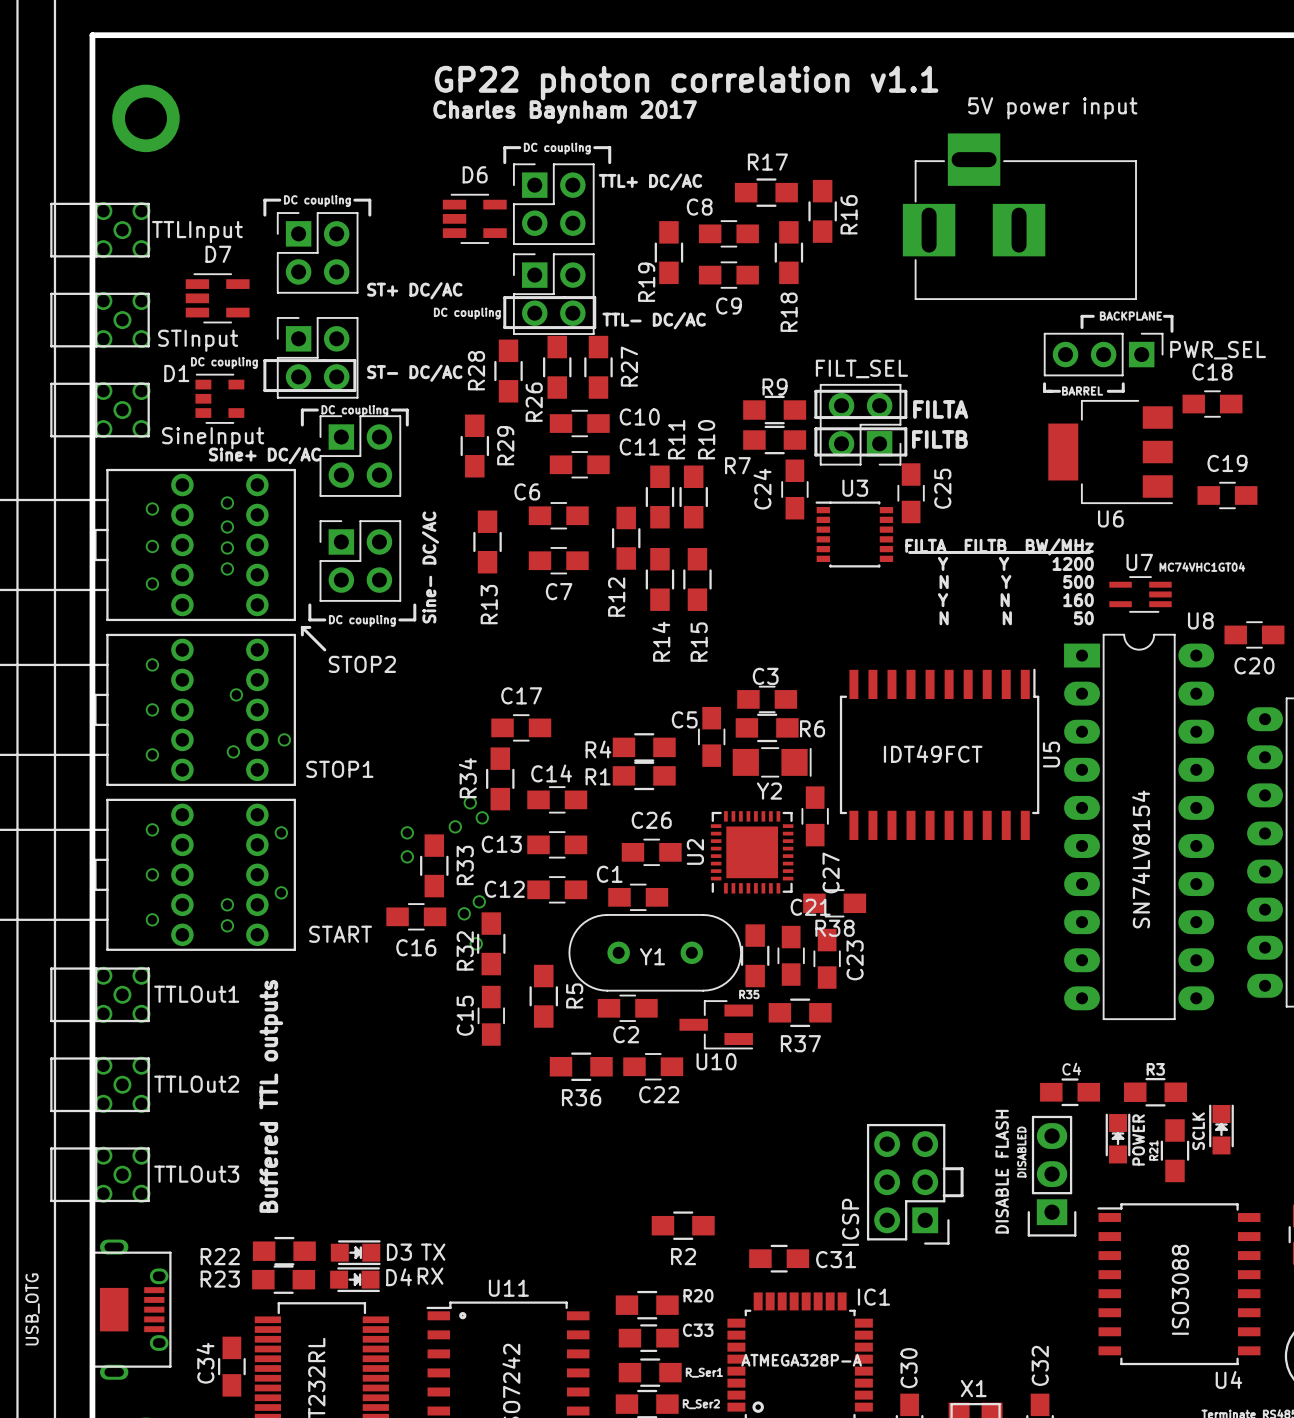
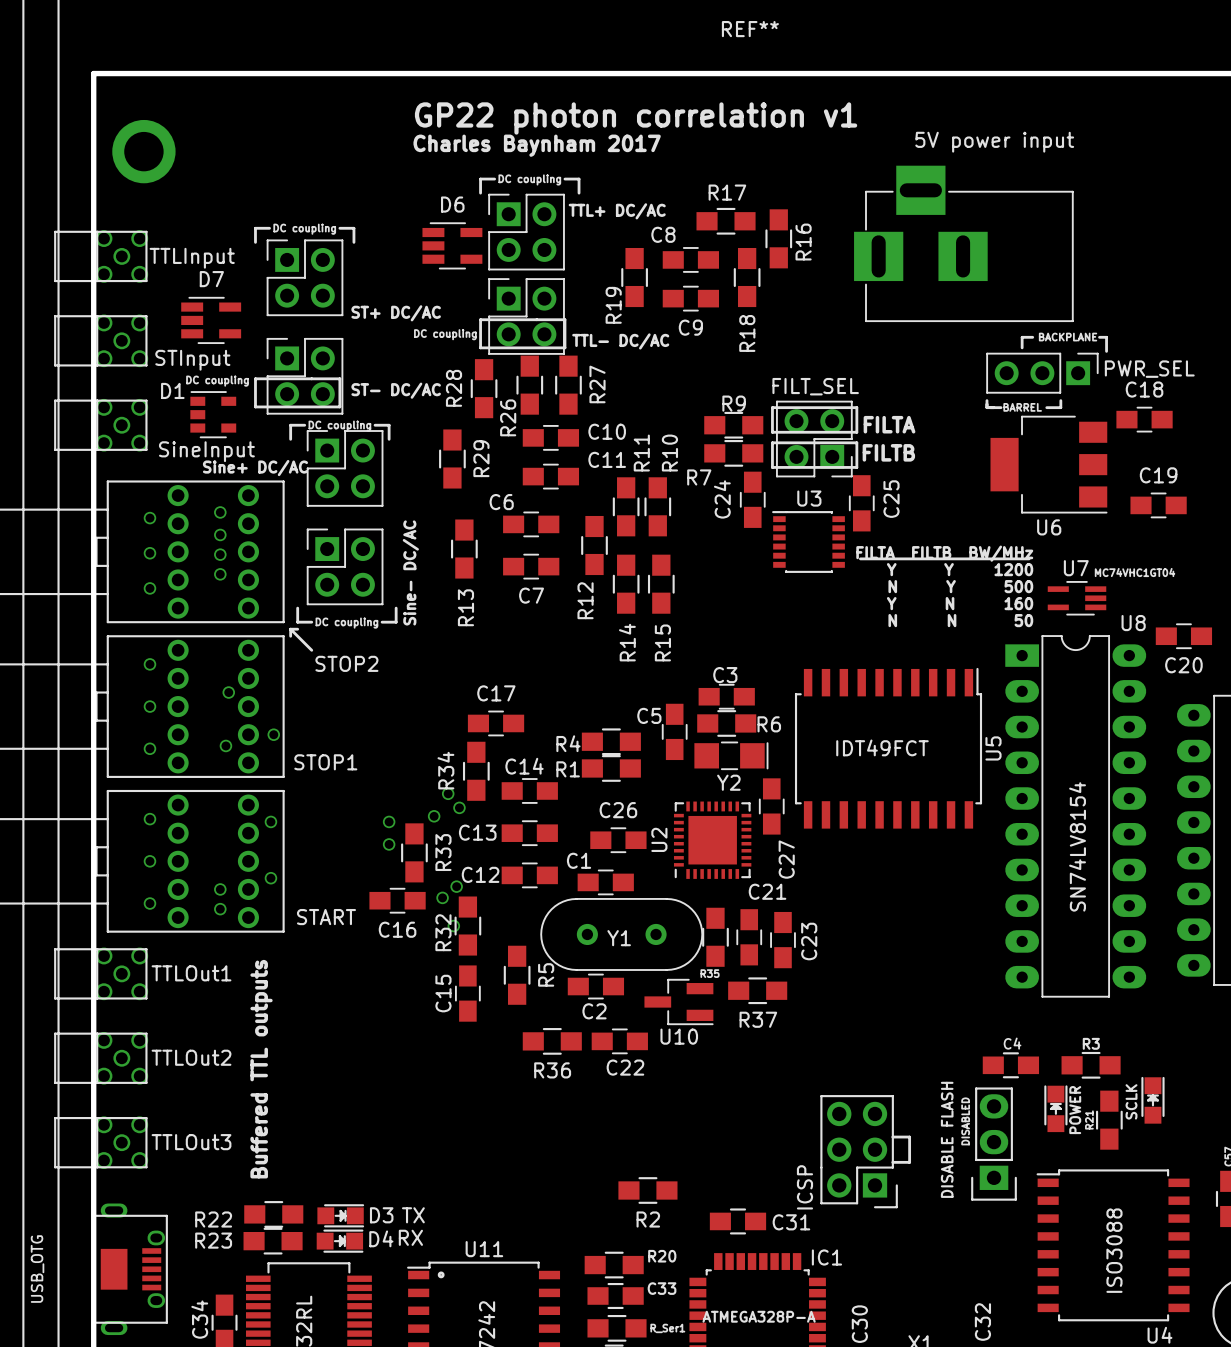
text: GP22 photon correlation v1.1 (686, 83) -> GP22 photon correlation v1 (636, 118)
R38: (834, 903) -> none

